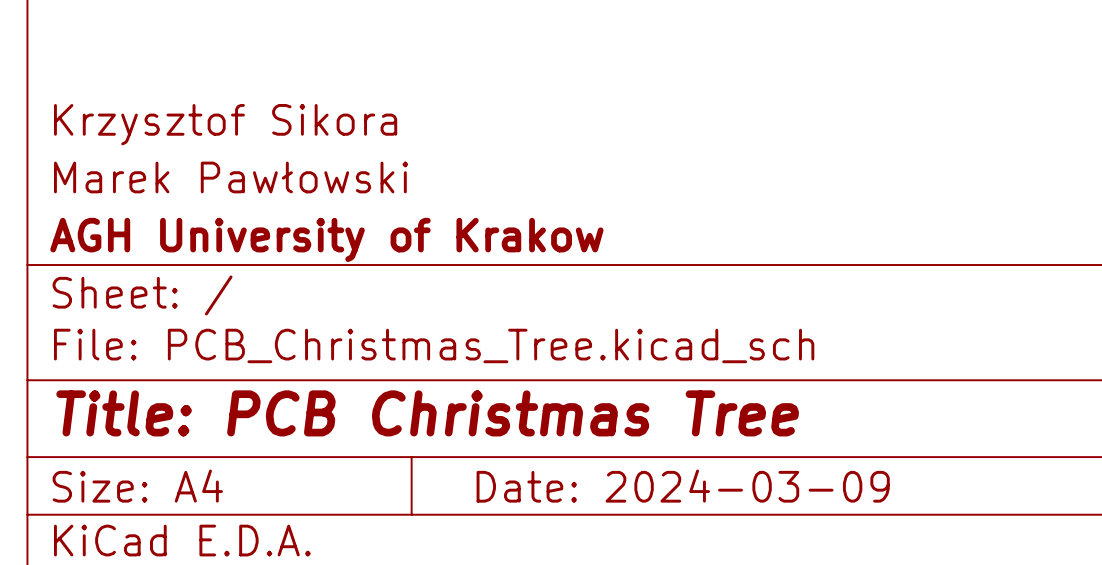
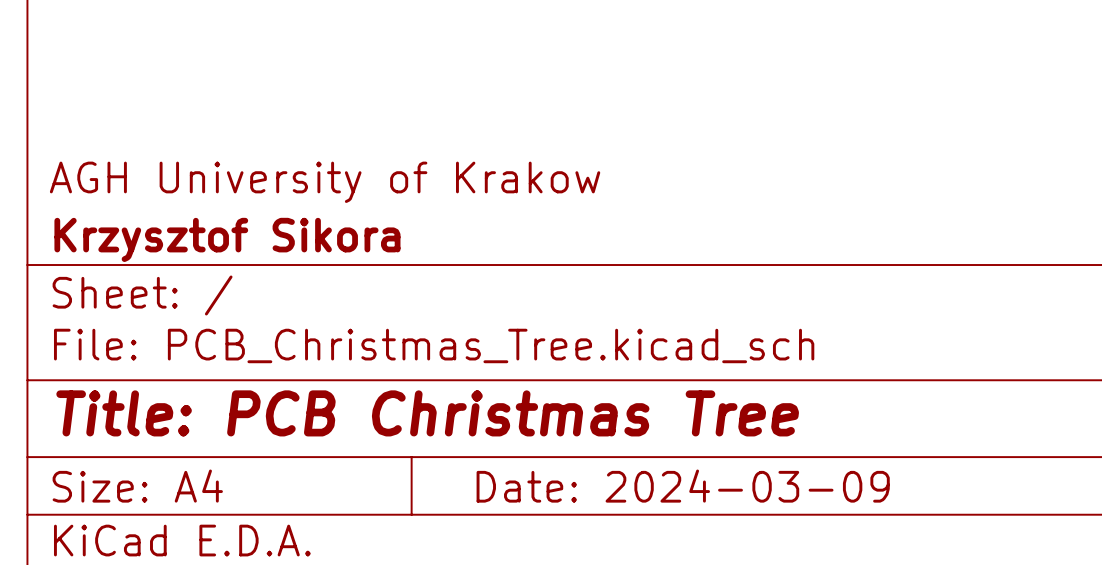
title block: Krzysztof Sikora (225, 124) -> none
title block: Marek Pawłowski (231, 177) -> AGH University of Krakow (325, 182)
title block: AGH University of Krakow (326, 239) -> Krzysztof Sikora (227, 239)

